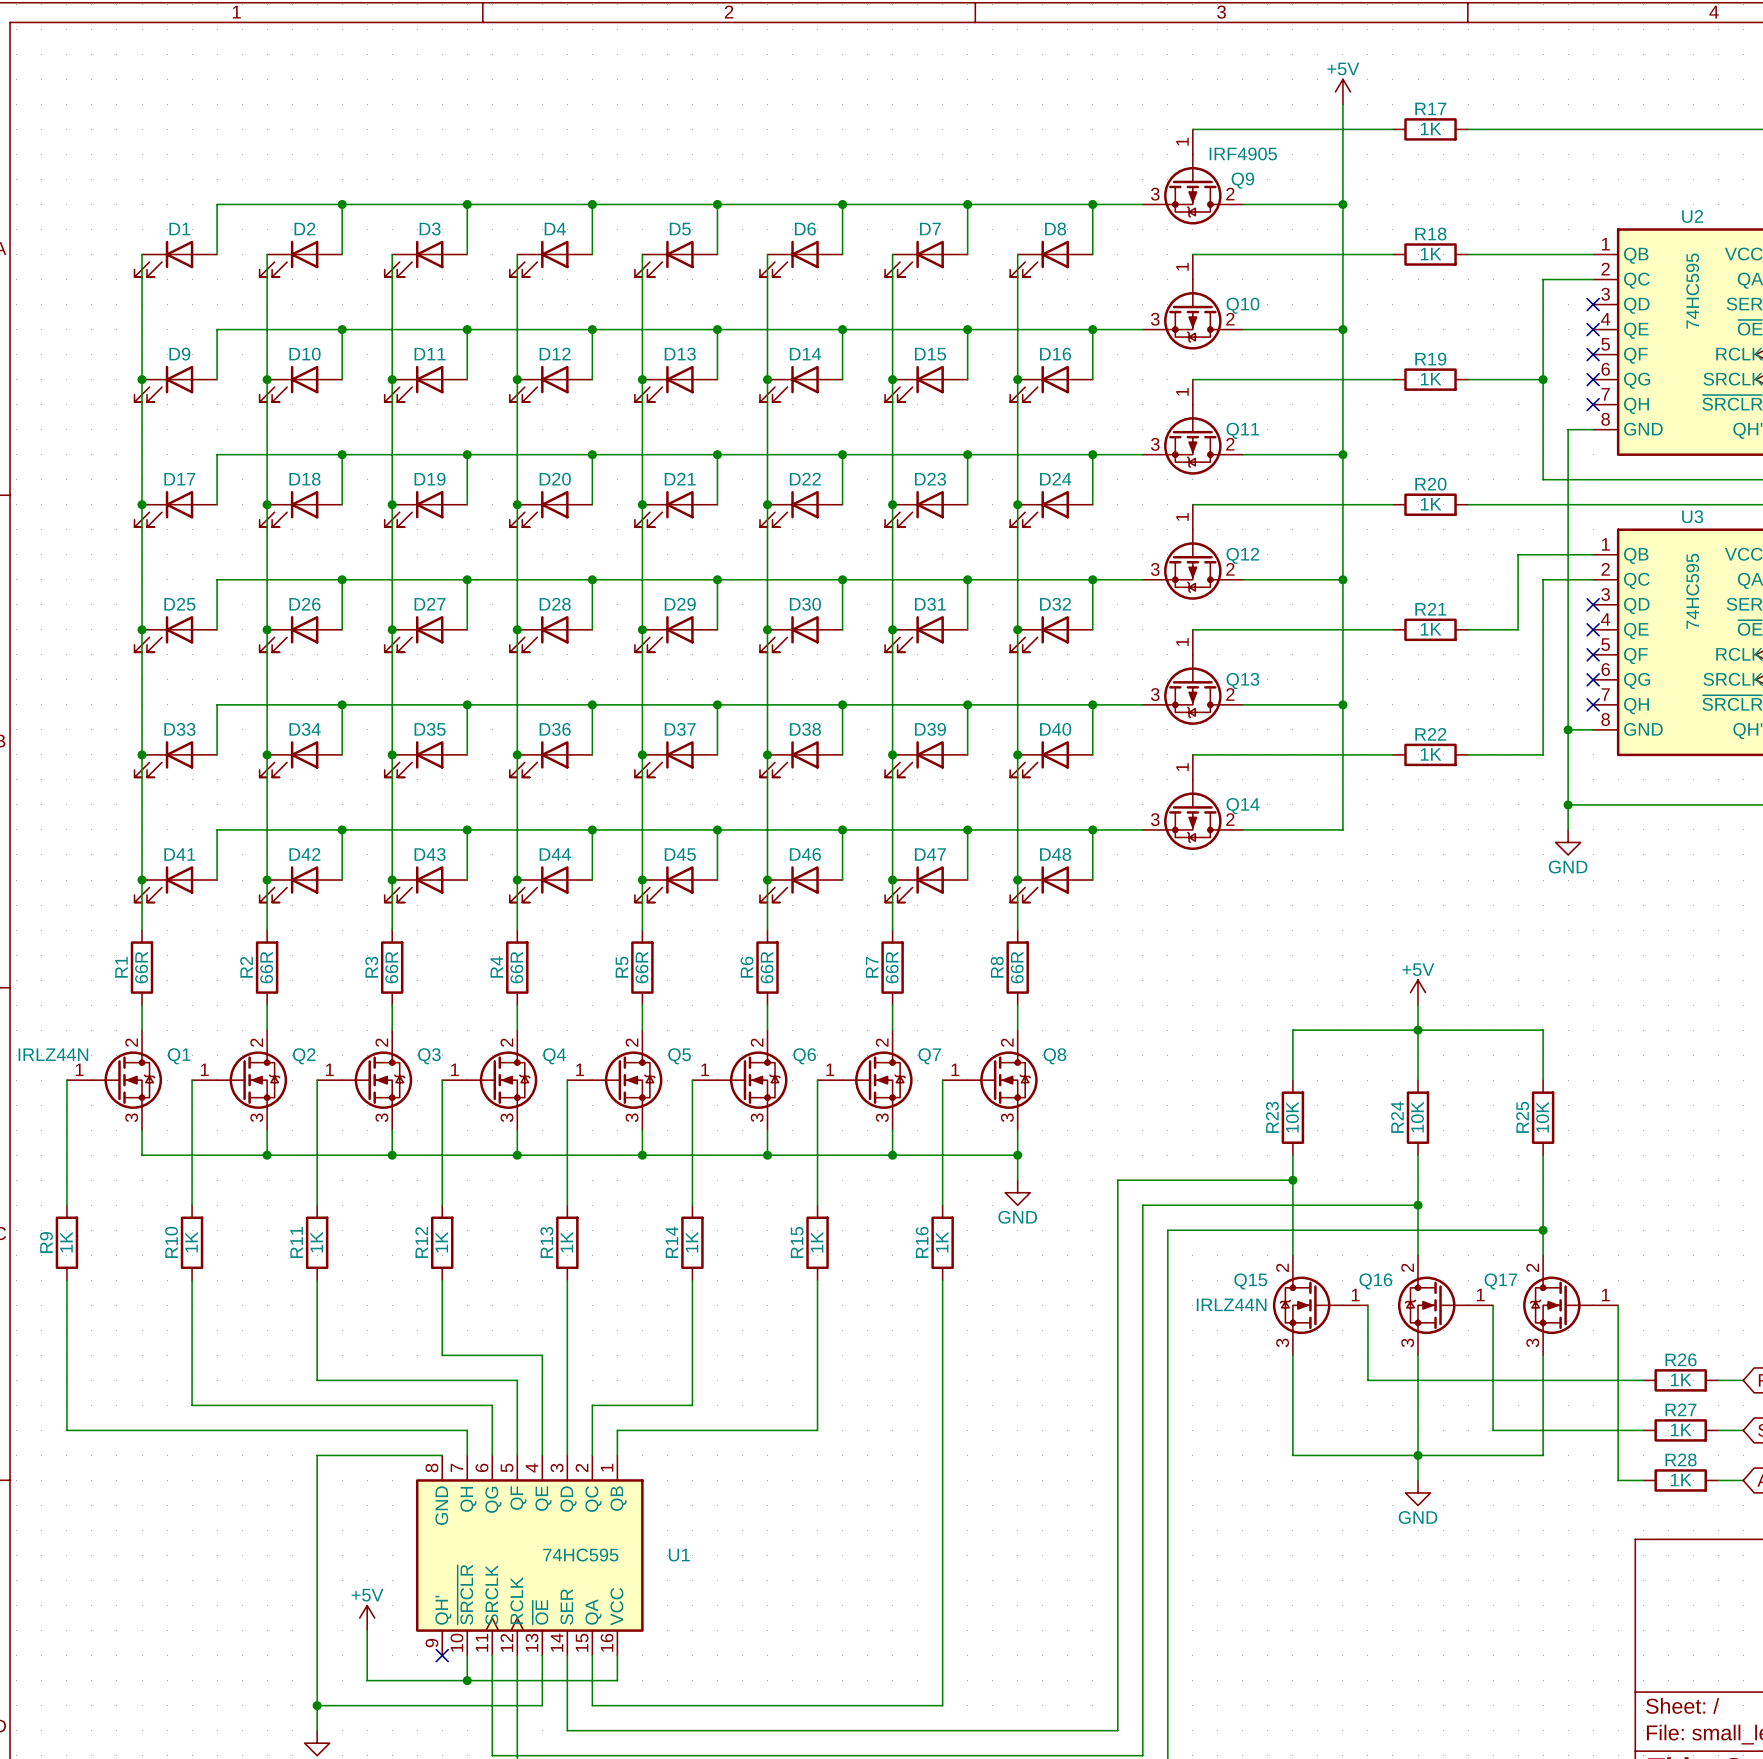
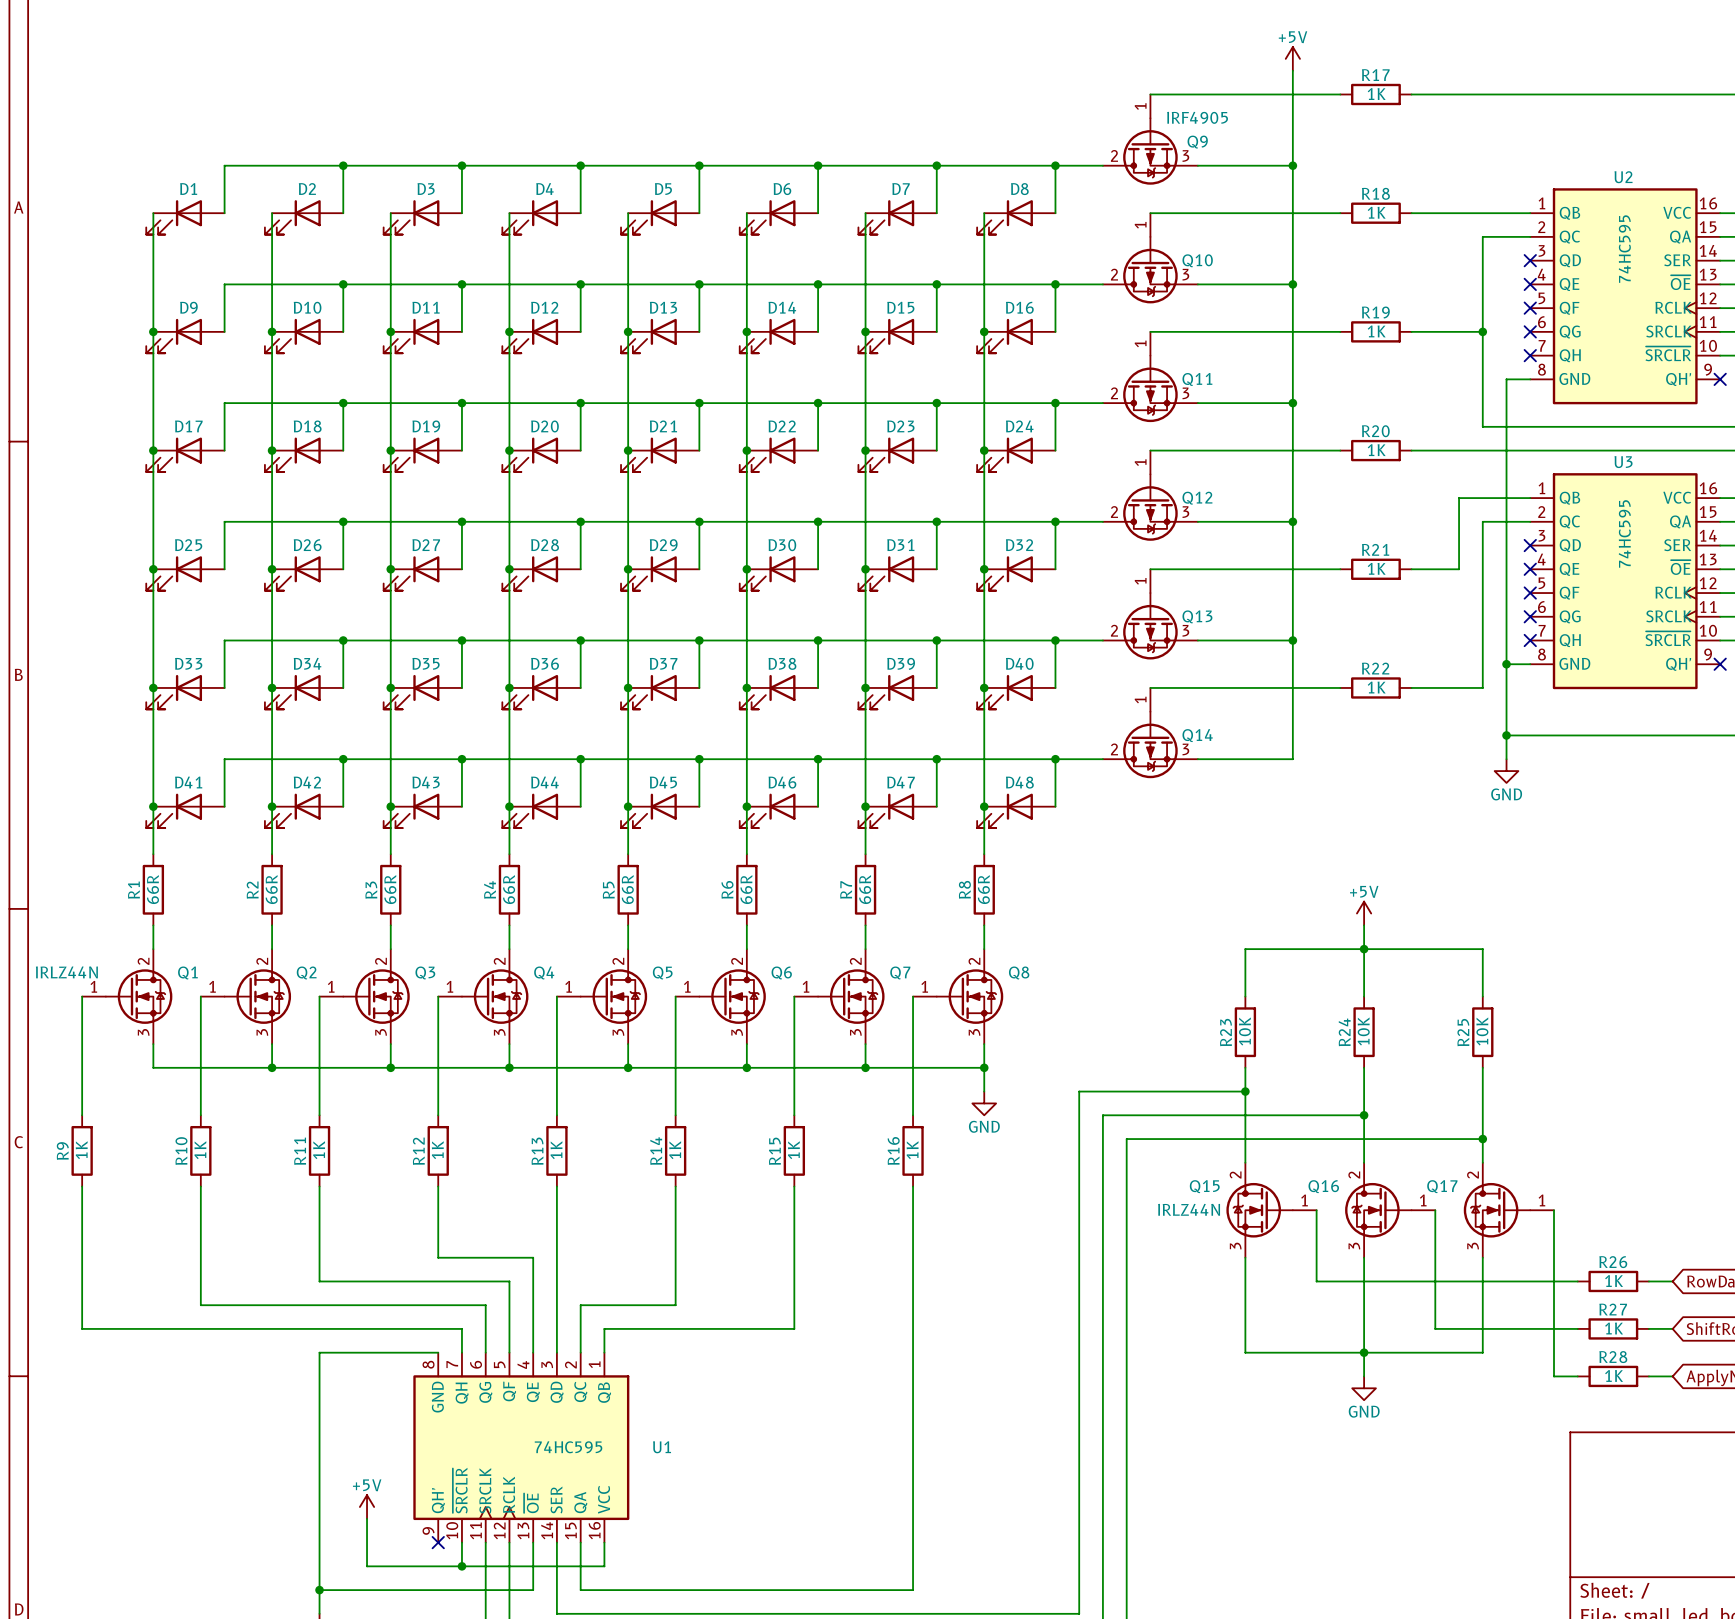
Q9 flip: as is (1192, 189) -> left-right (1150, 151)
Q10 flip: as is (1192, 314) -> left-right (1150, 270)
Q11 flip: as is (1192, 439) -> left-right (1150, 388)
Q12 flip: as is (1192, 564) -> left-right (1150, 507)
Q13 flip: as is (1192, 689) -> left-right (1150, 626)
Q14 flip: as is (1192, 814) -> left-right (1150, 744)

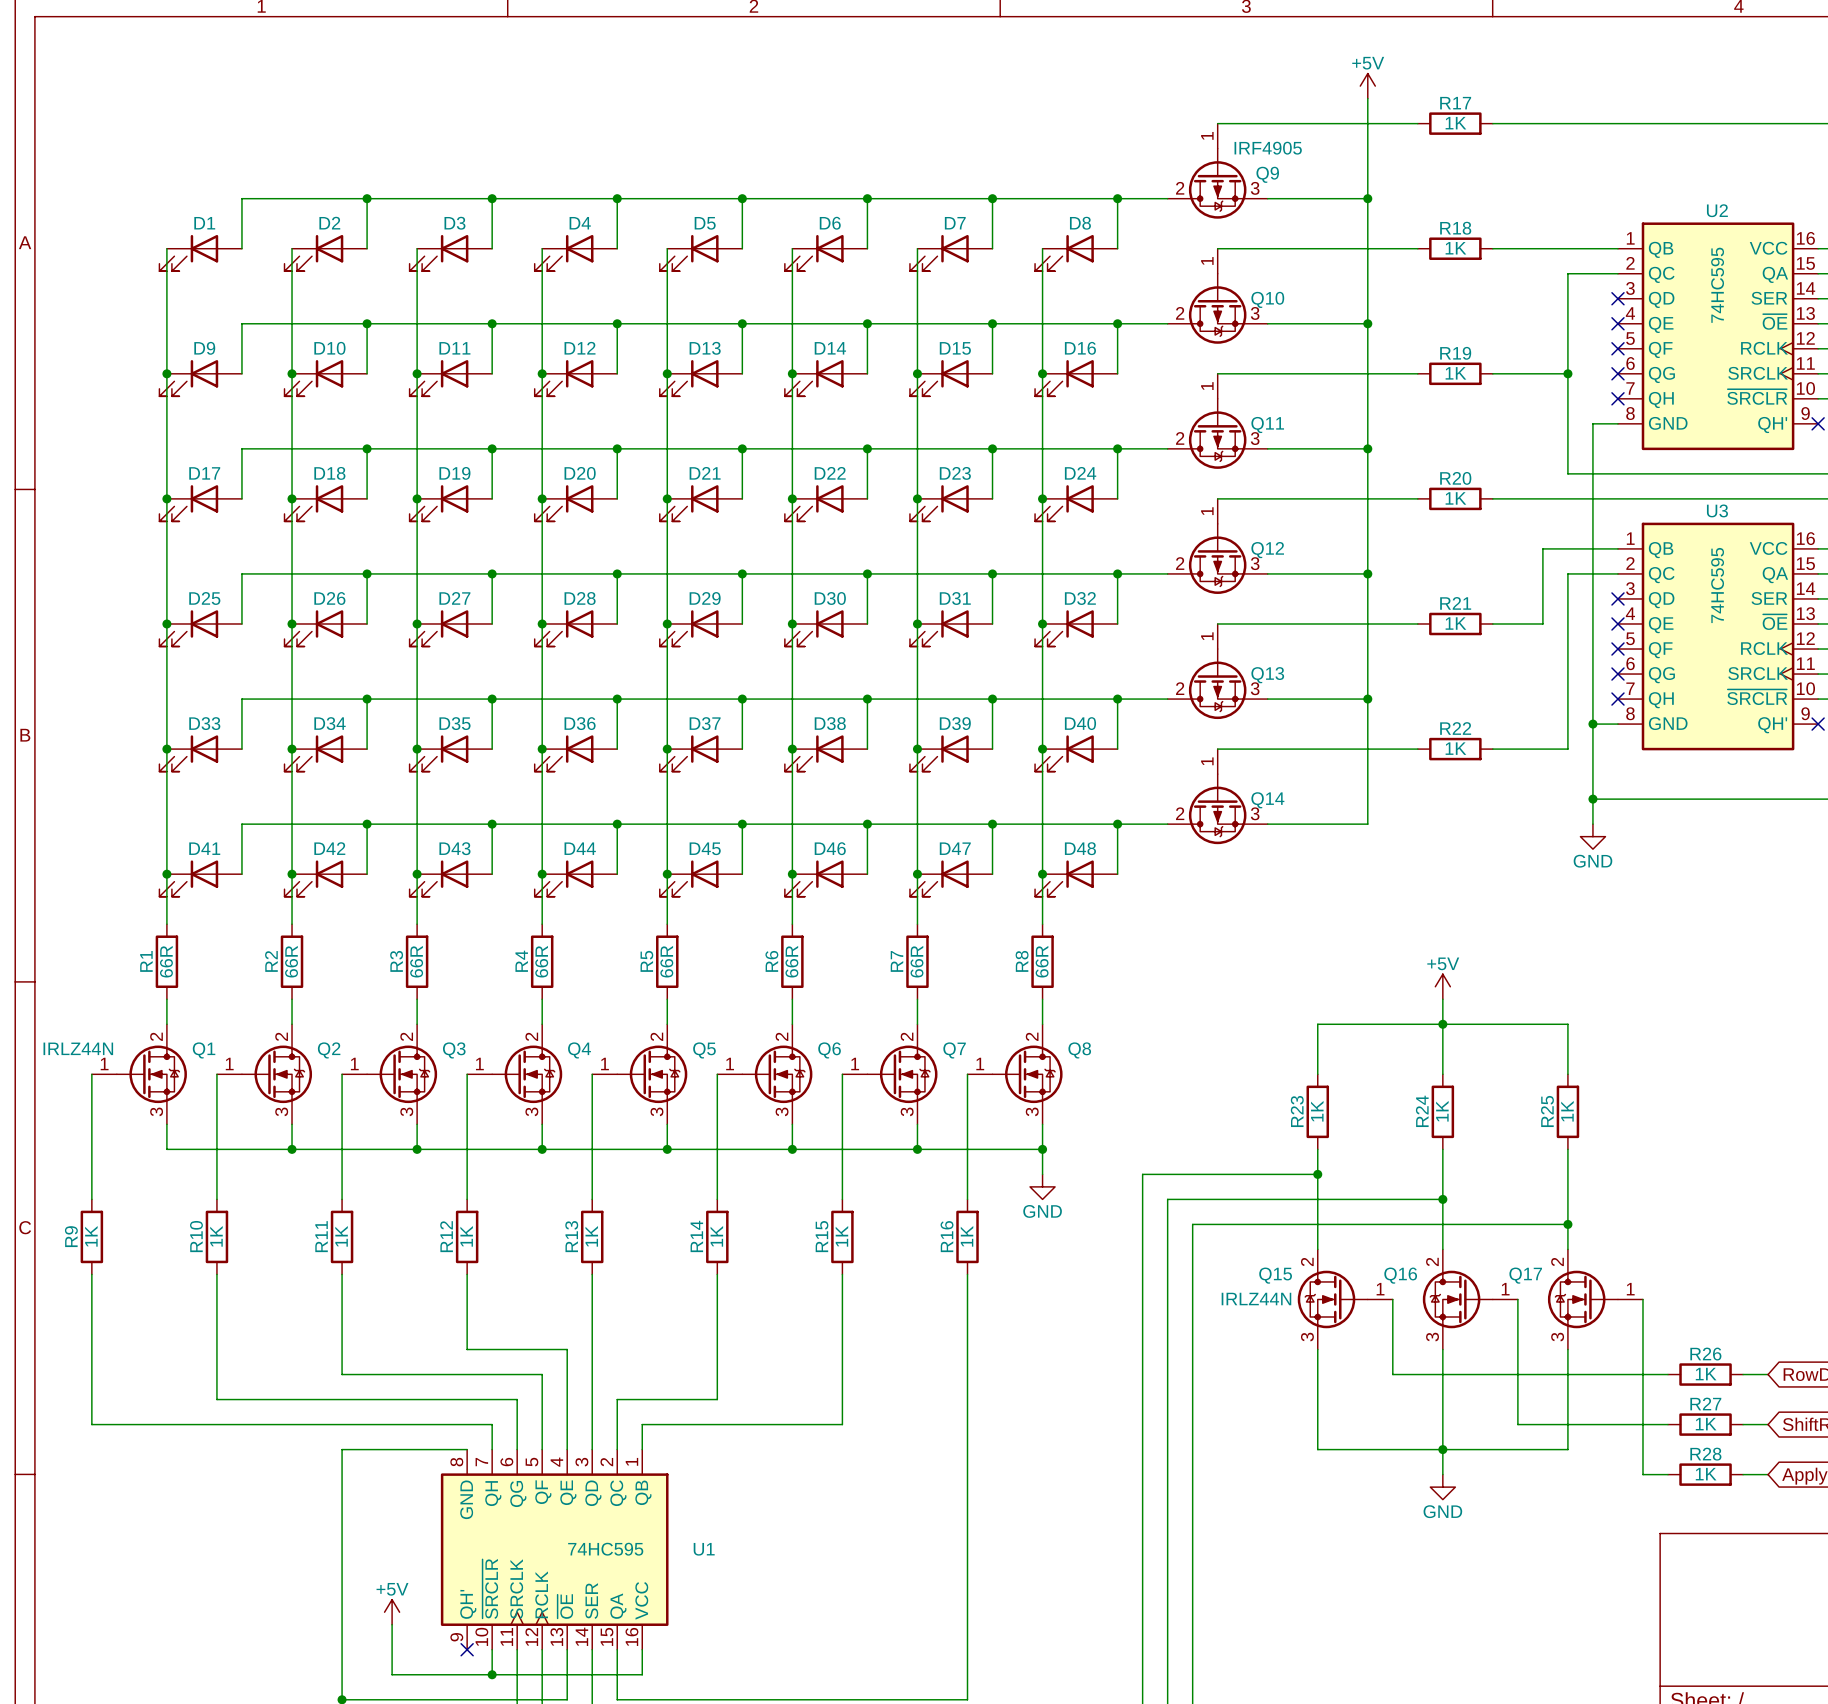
R23 value: 10K (1245, 1031) -> 1K (1317, 1111)
R24 value: 10K (1363, 1031) -> 1K (1442, 1111)
R25 value: 10K (1482, 1031) -> 1K (1567, 1111)

